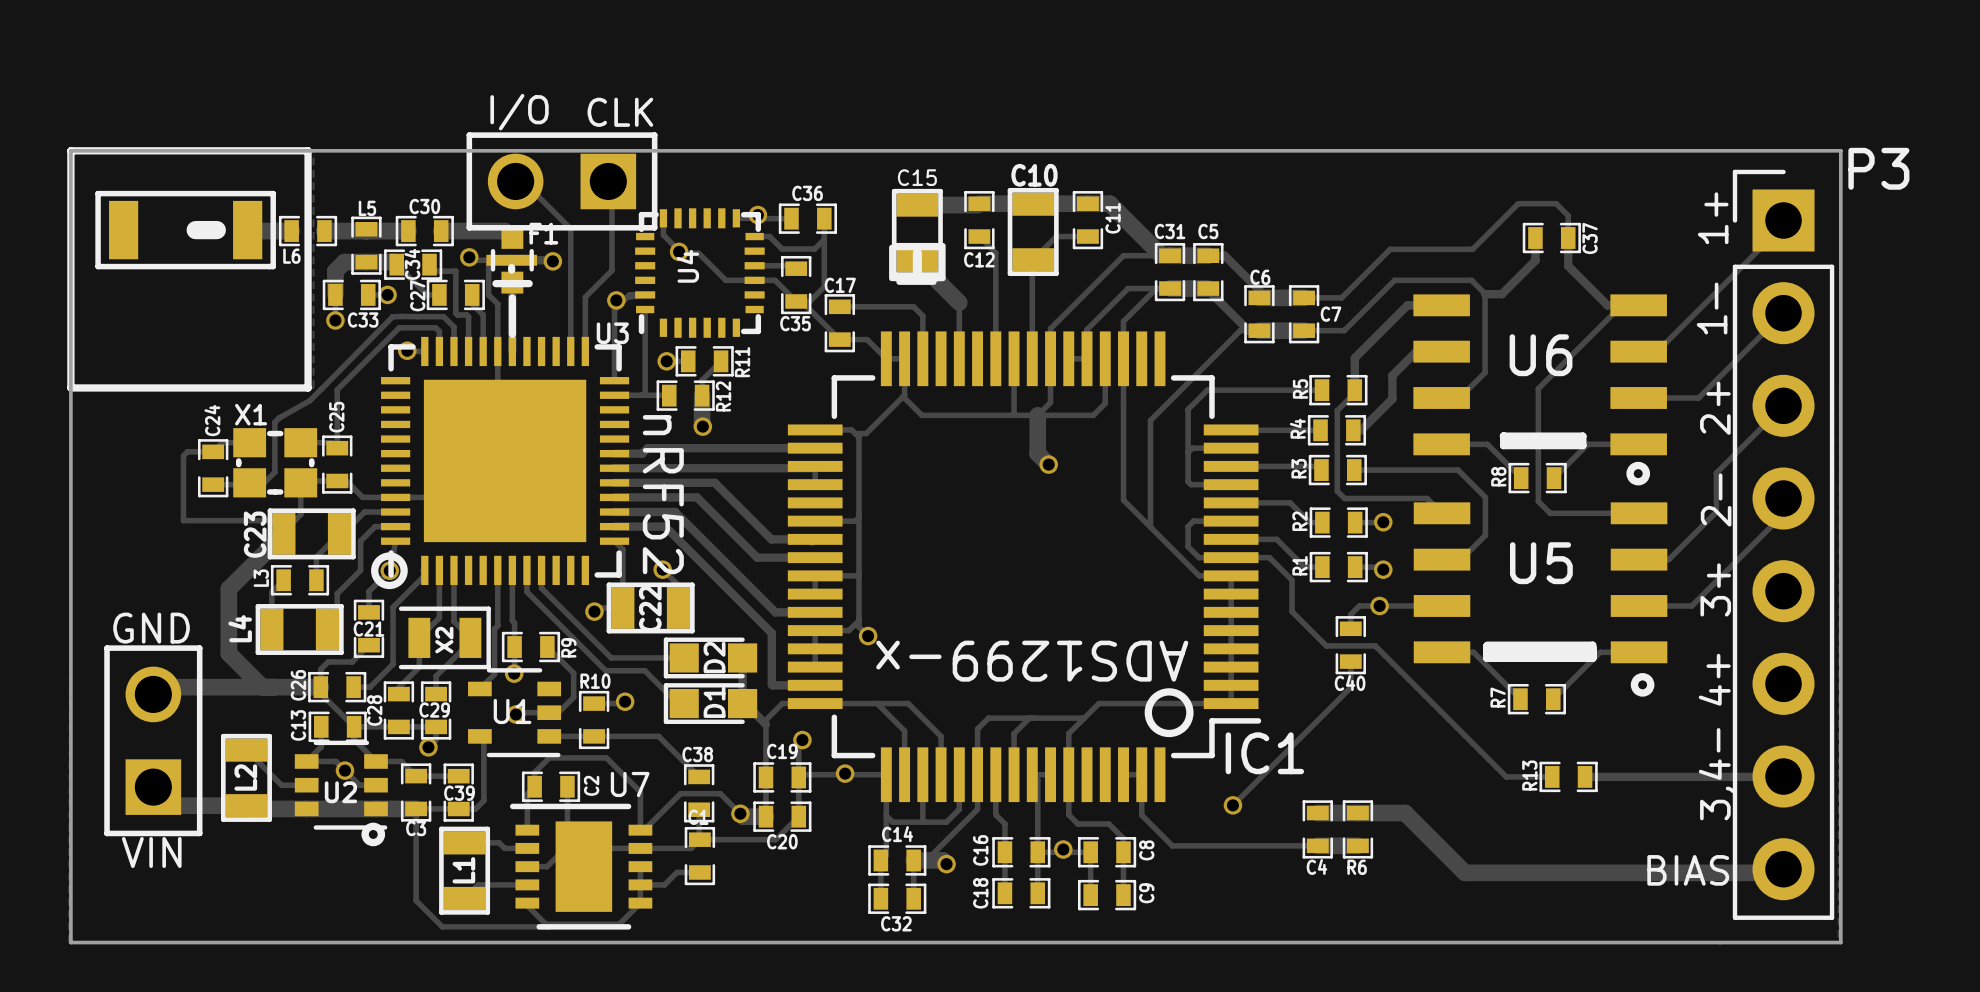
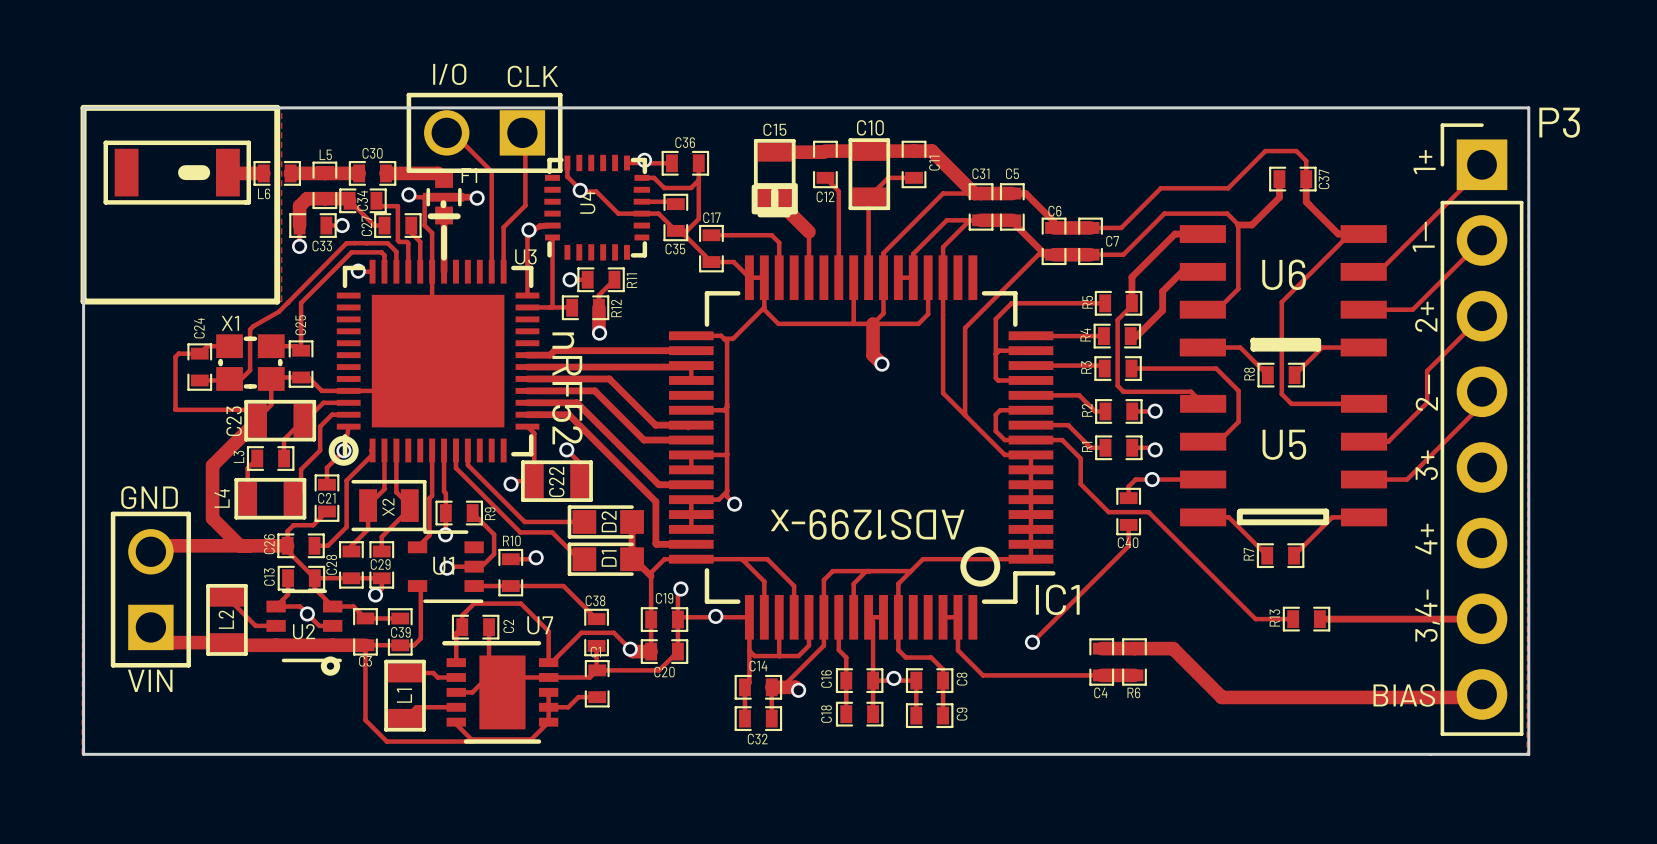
drawing: [1626, 461, 1651, 486] -> none
drawing: [1630, 673, 1655, 697] -> none

